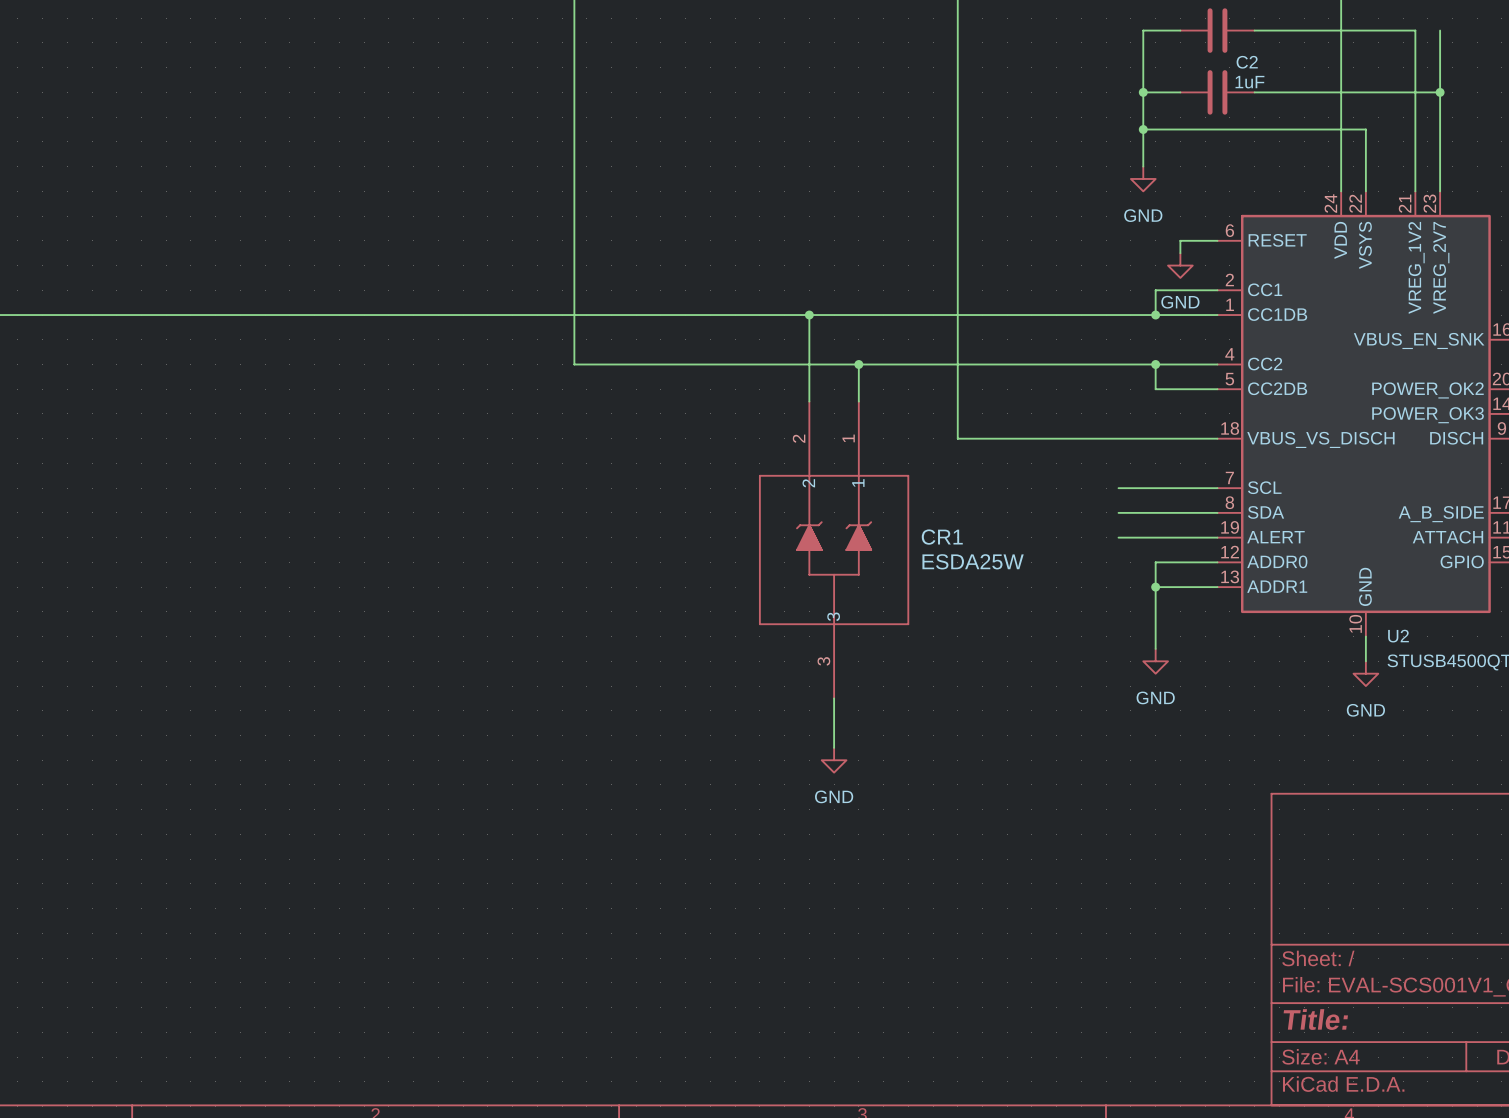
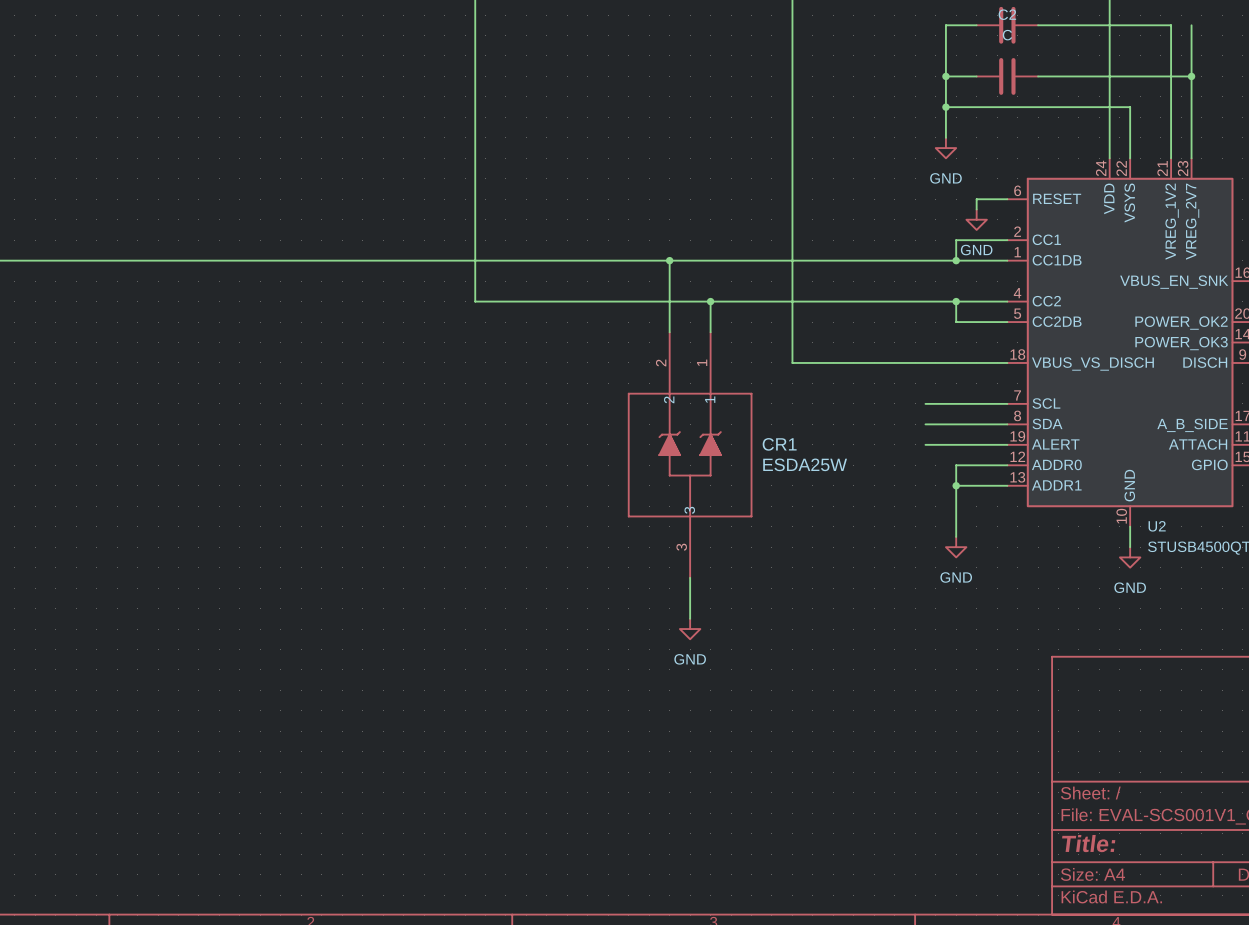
C2 name position: C2 (1247, 62) -> C2 (1007, 14)
C2 value: 1uF (1249, 82) -> C (1007, 35)

